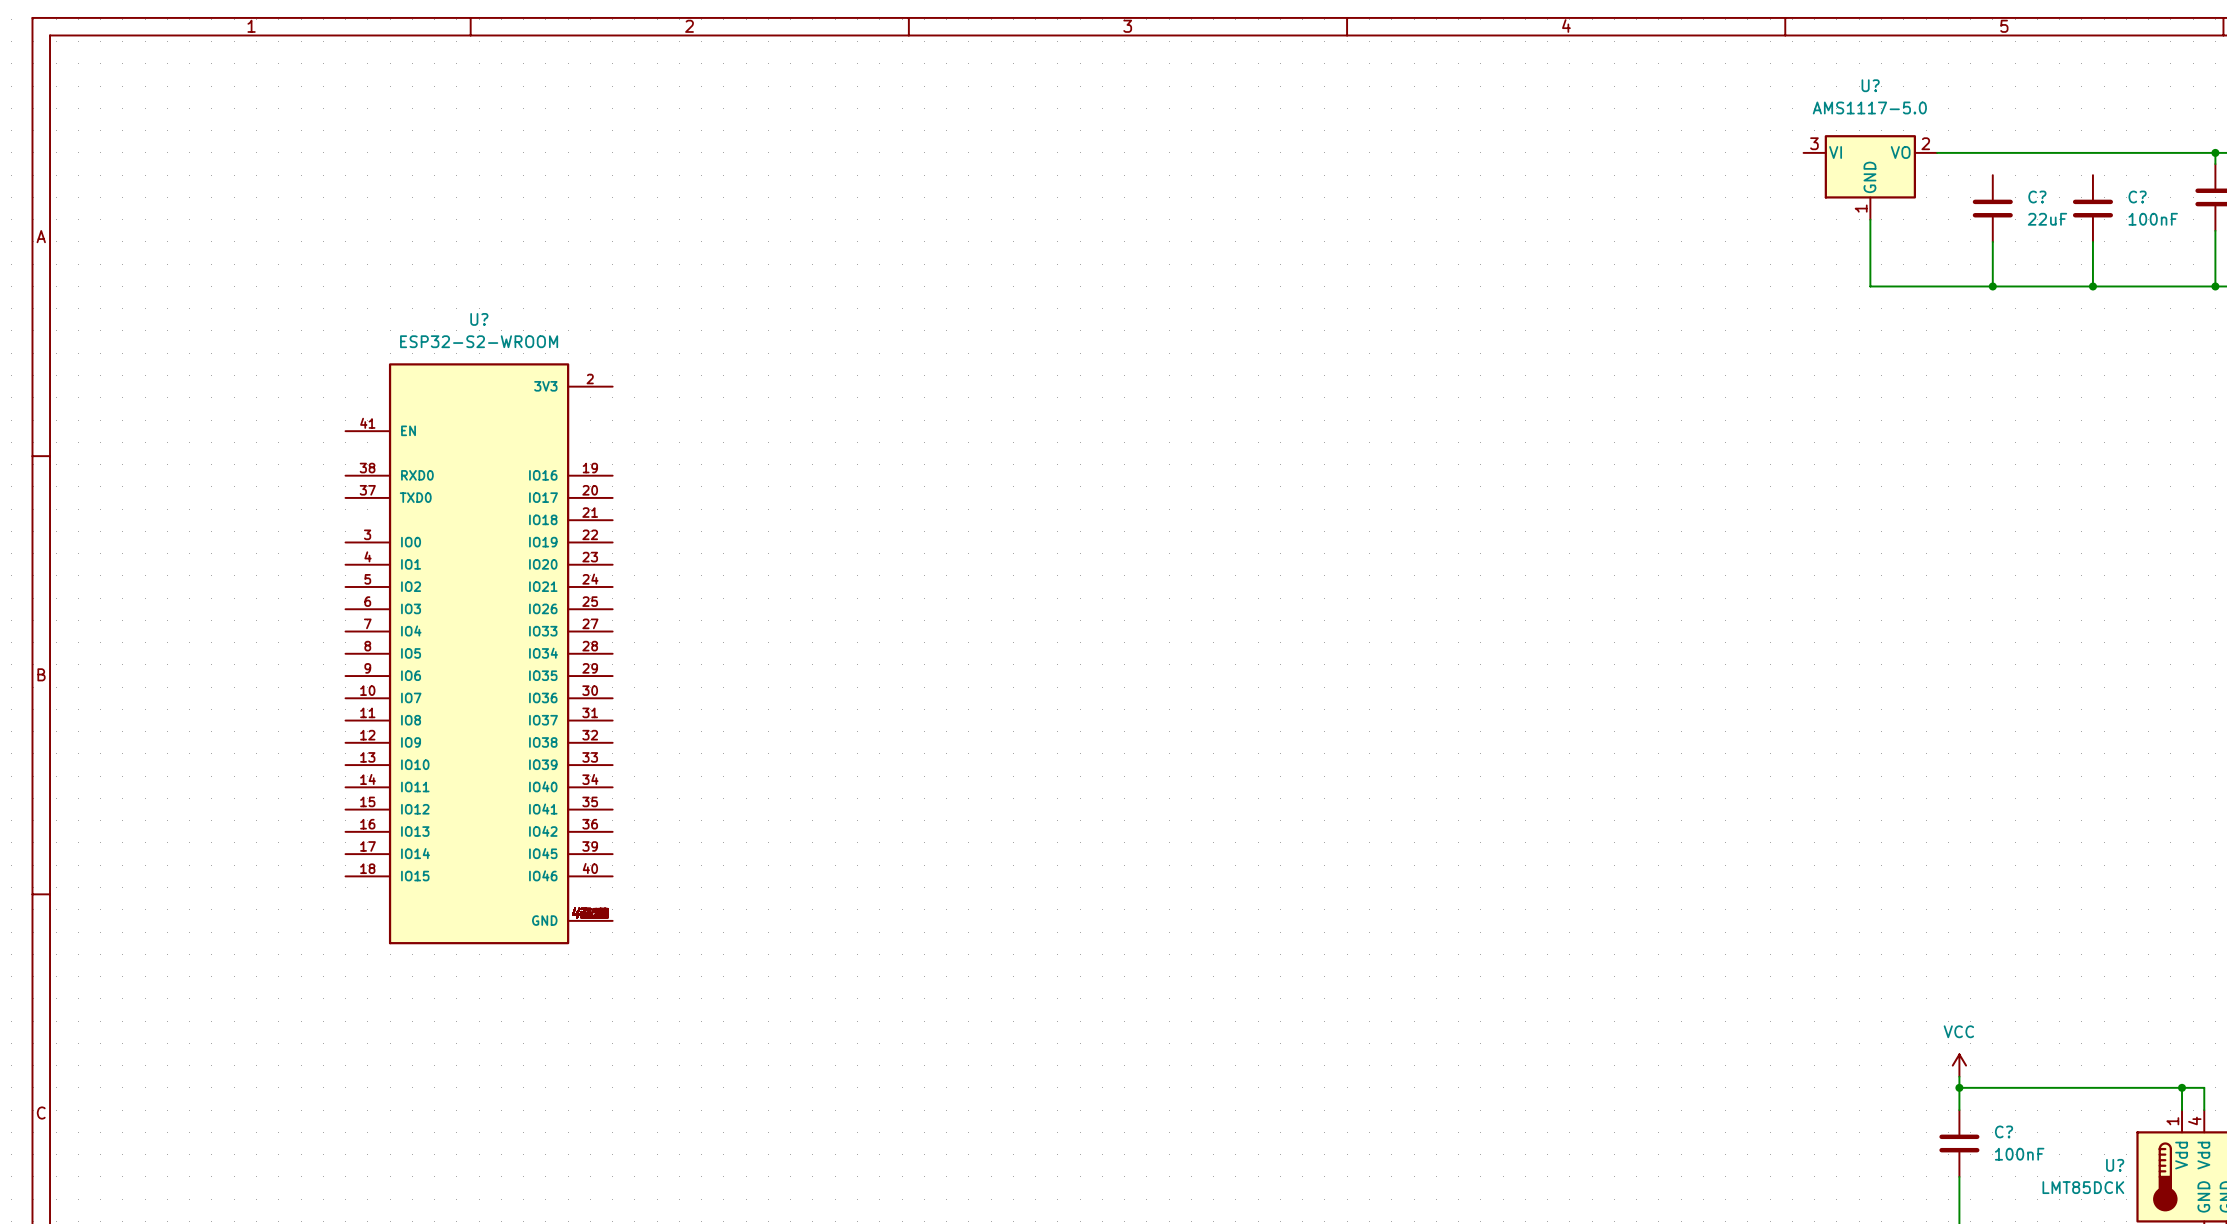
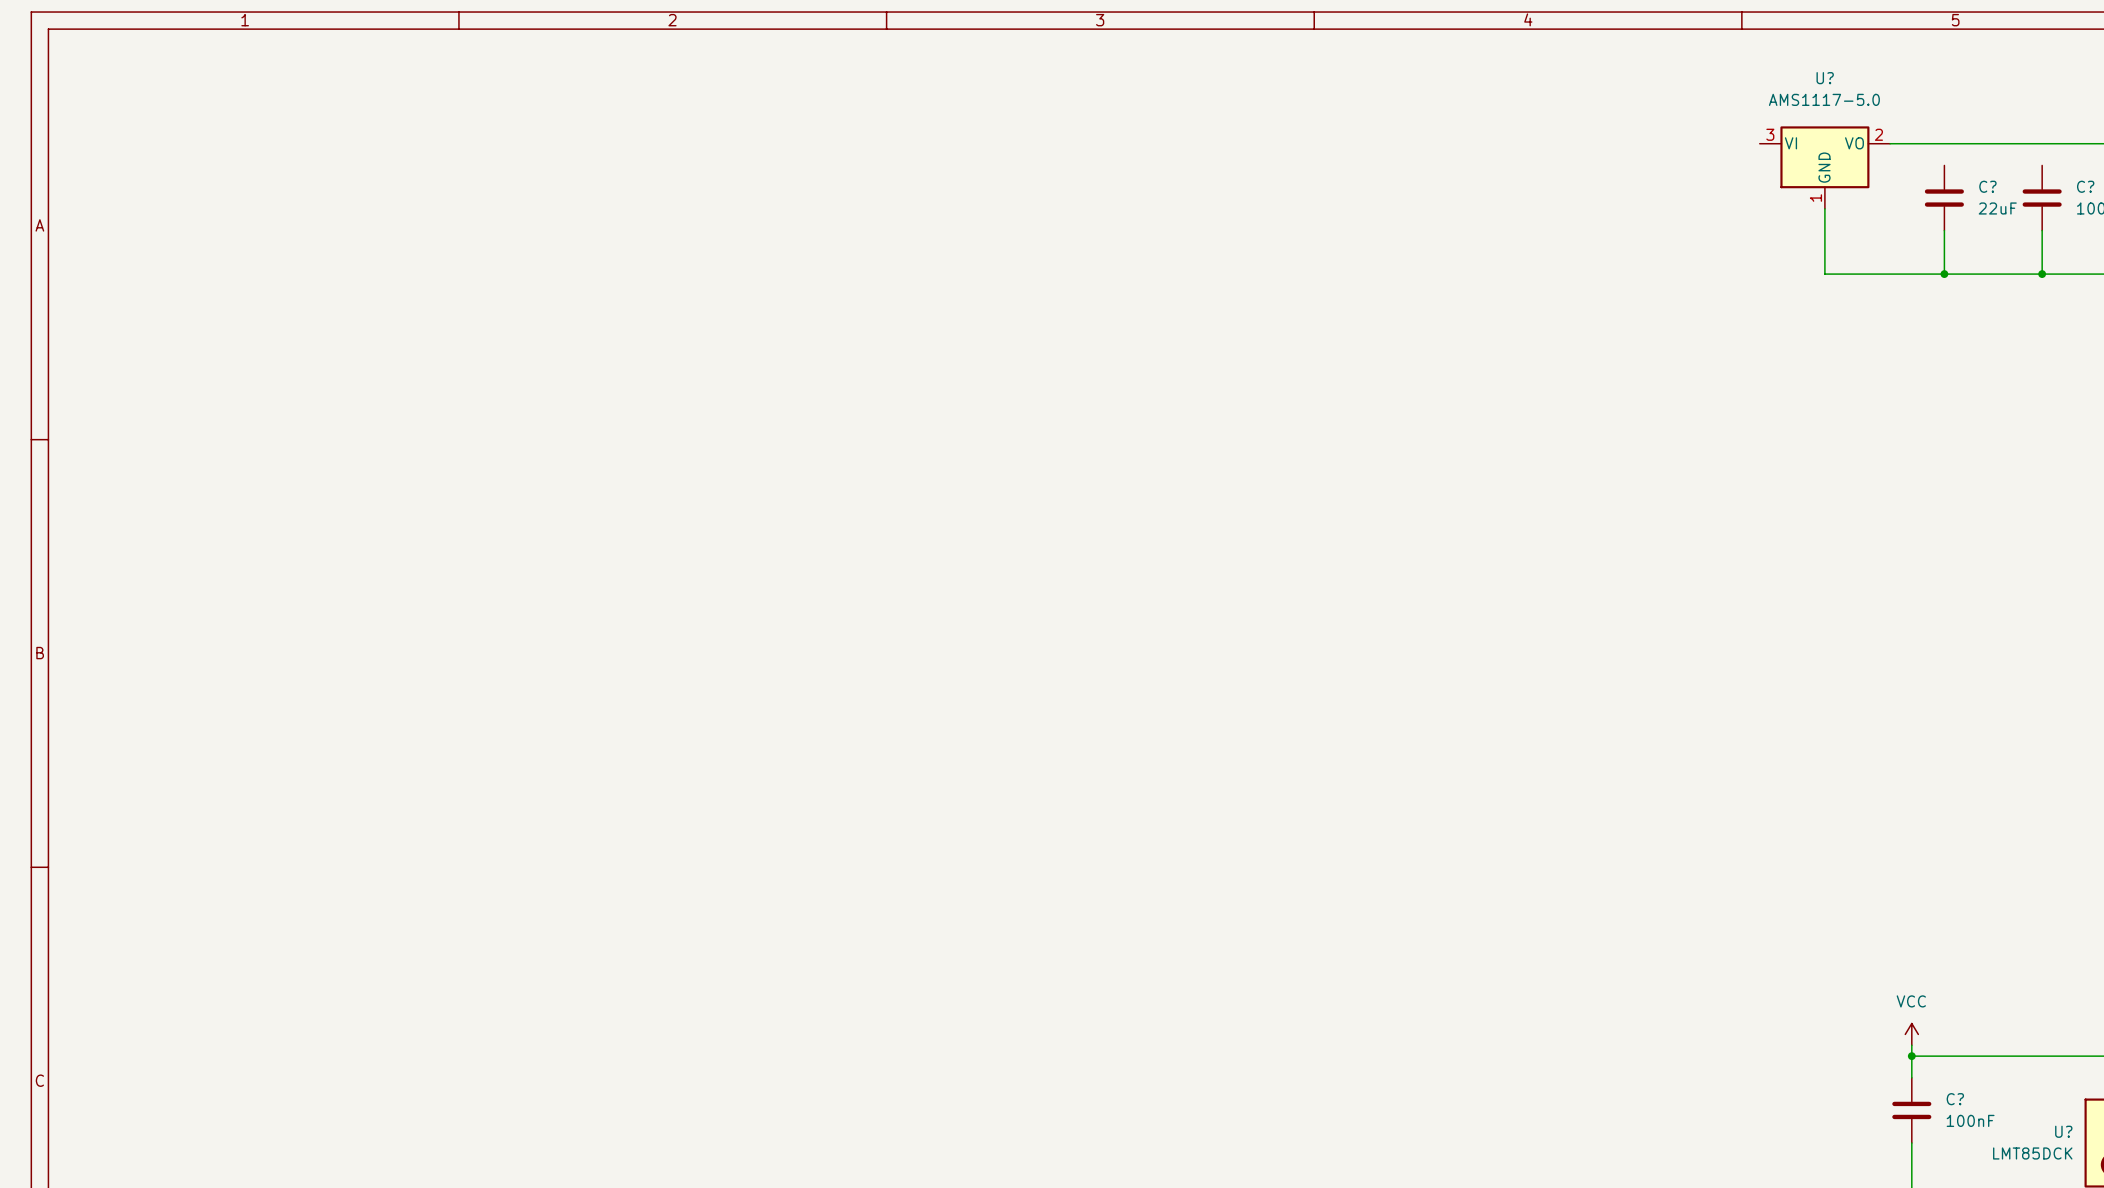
U?: ESP32-S2-WROOM (479, 653) -> none

